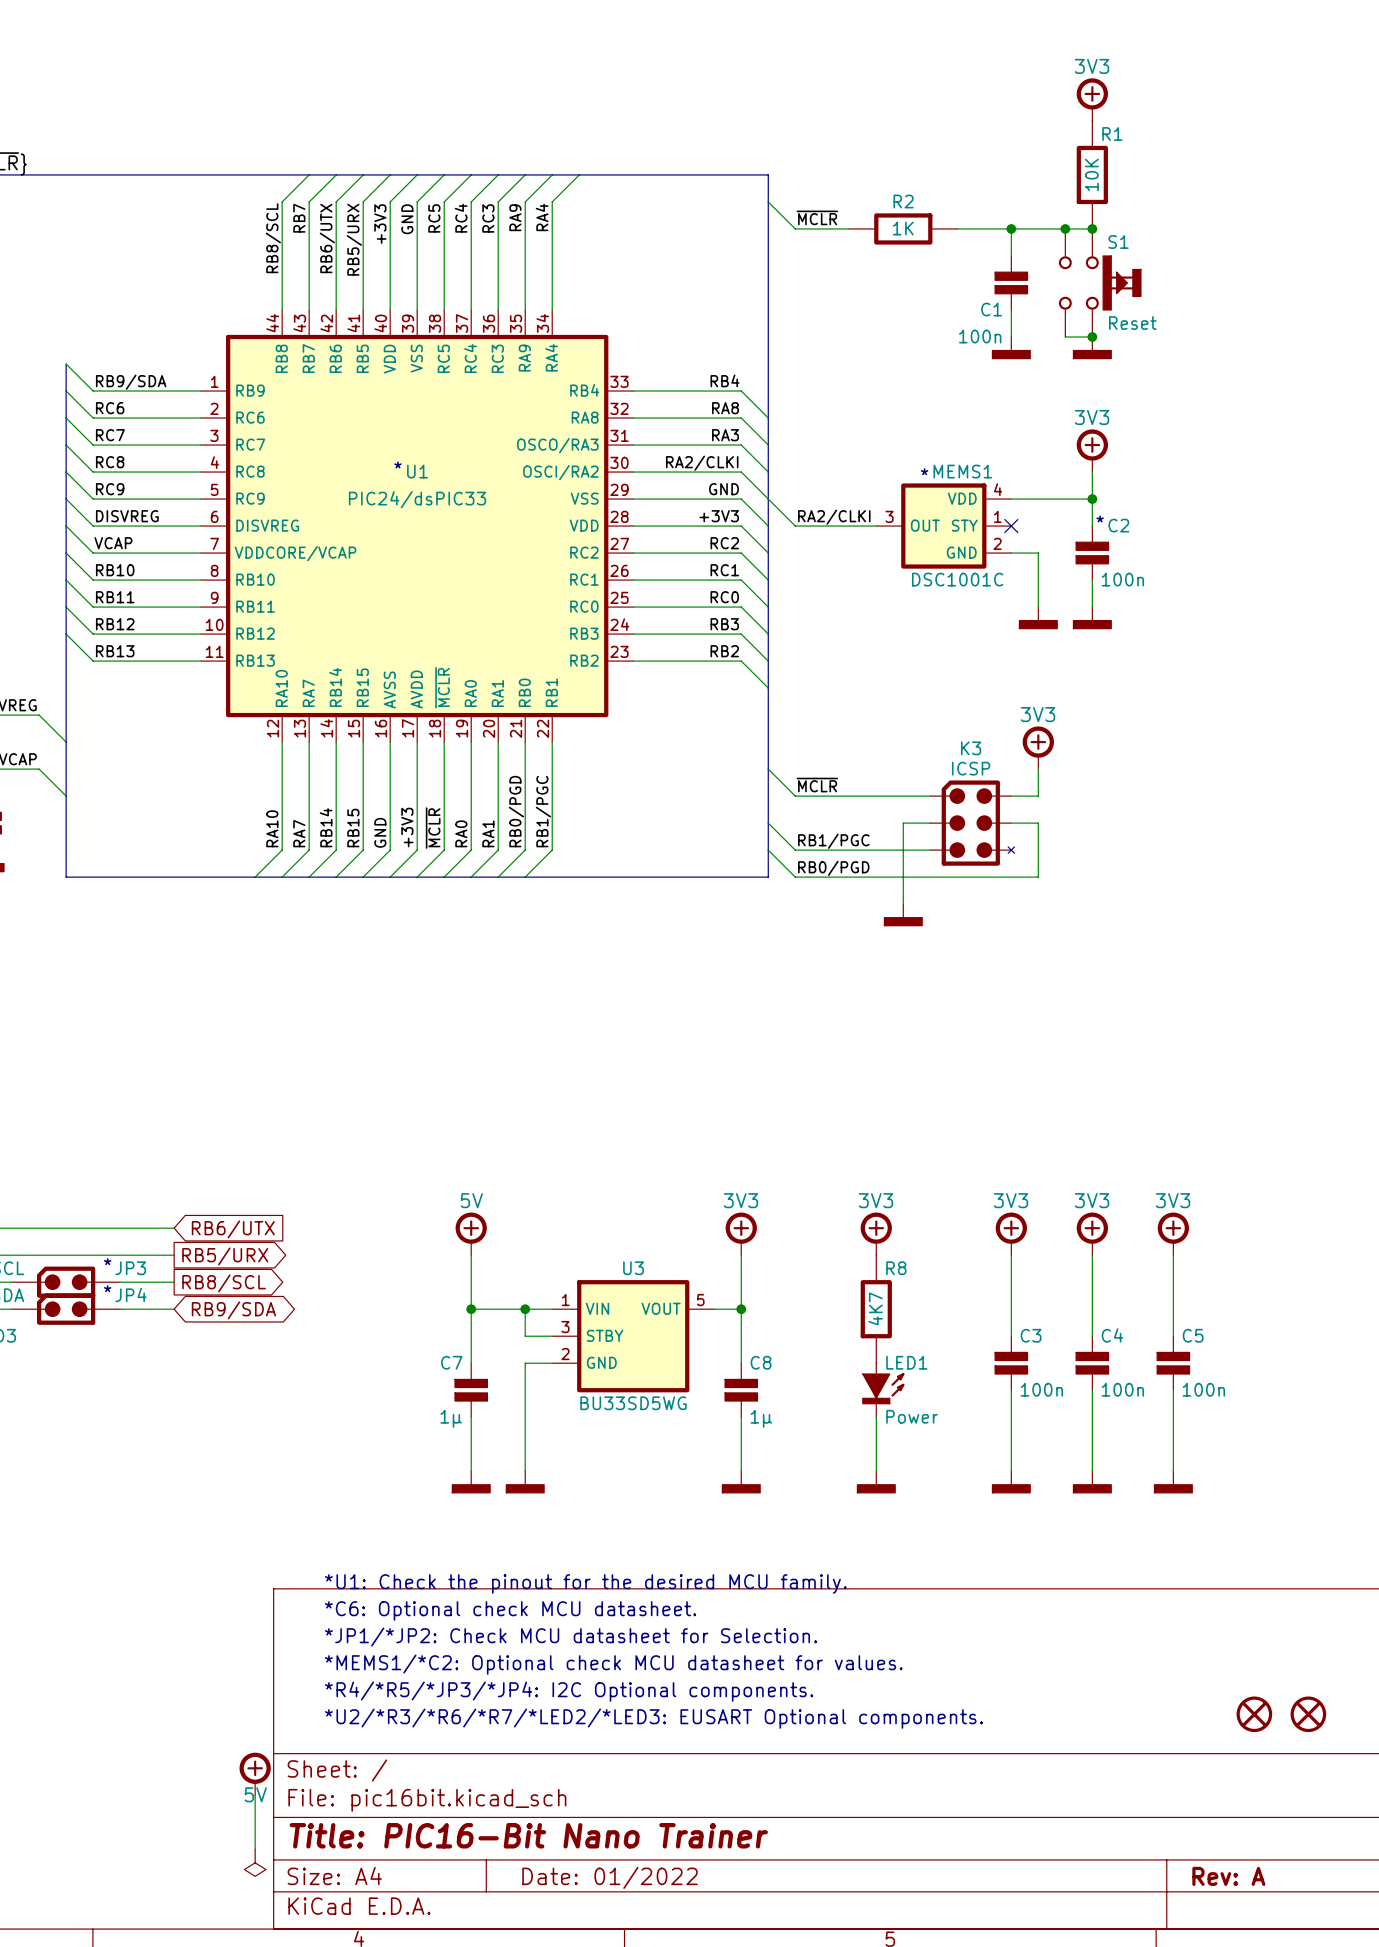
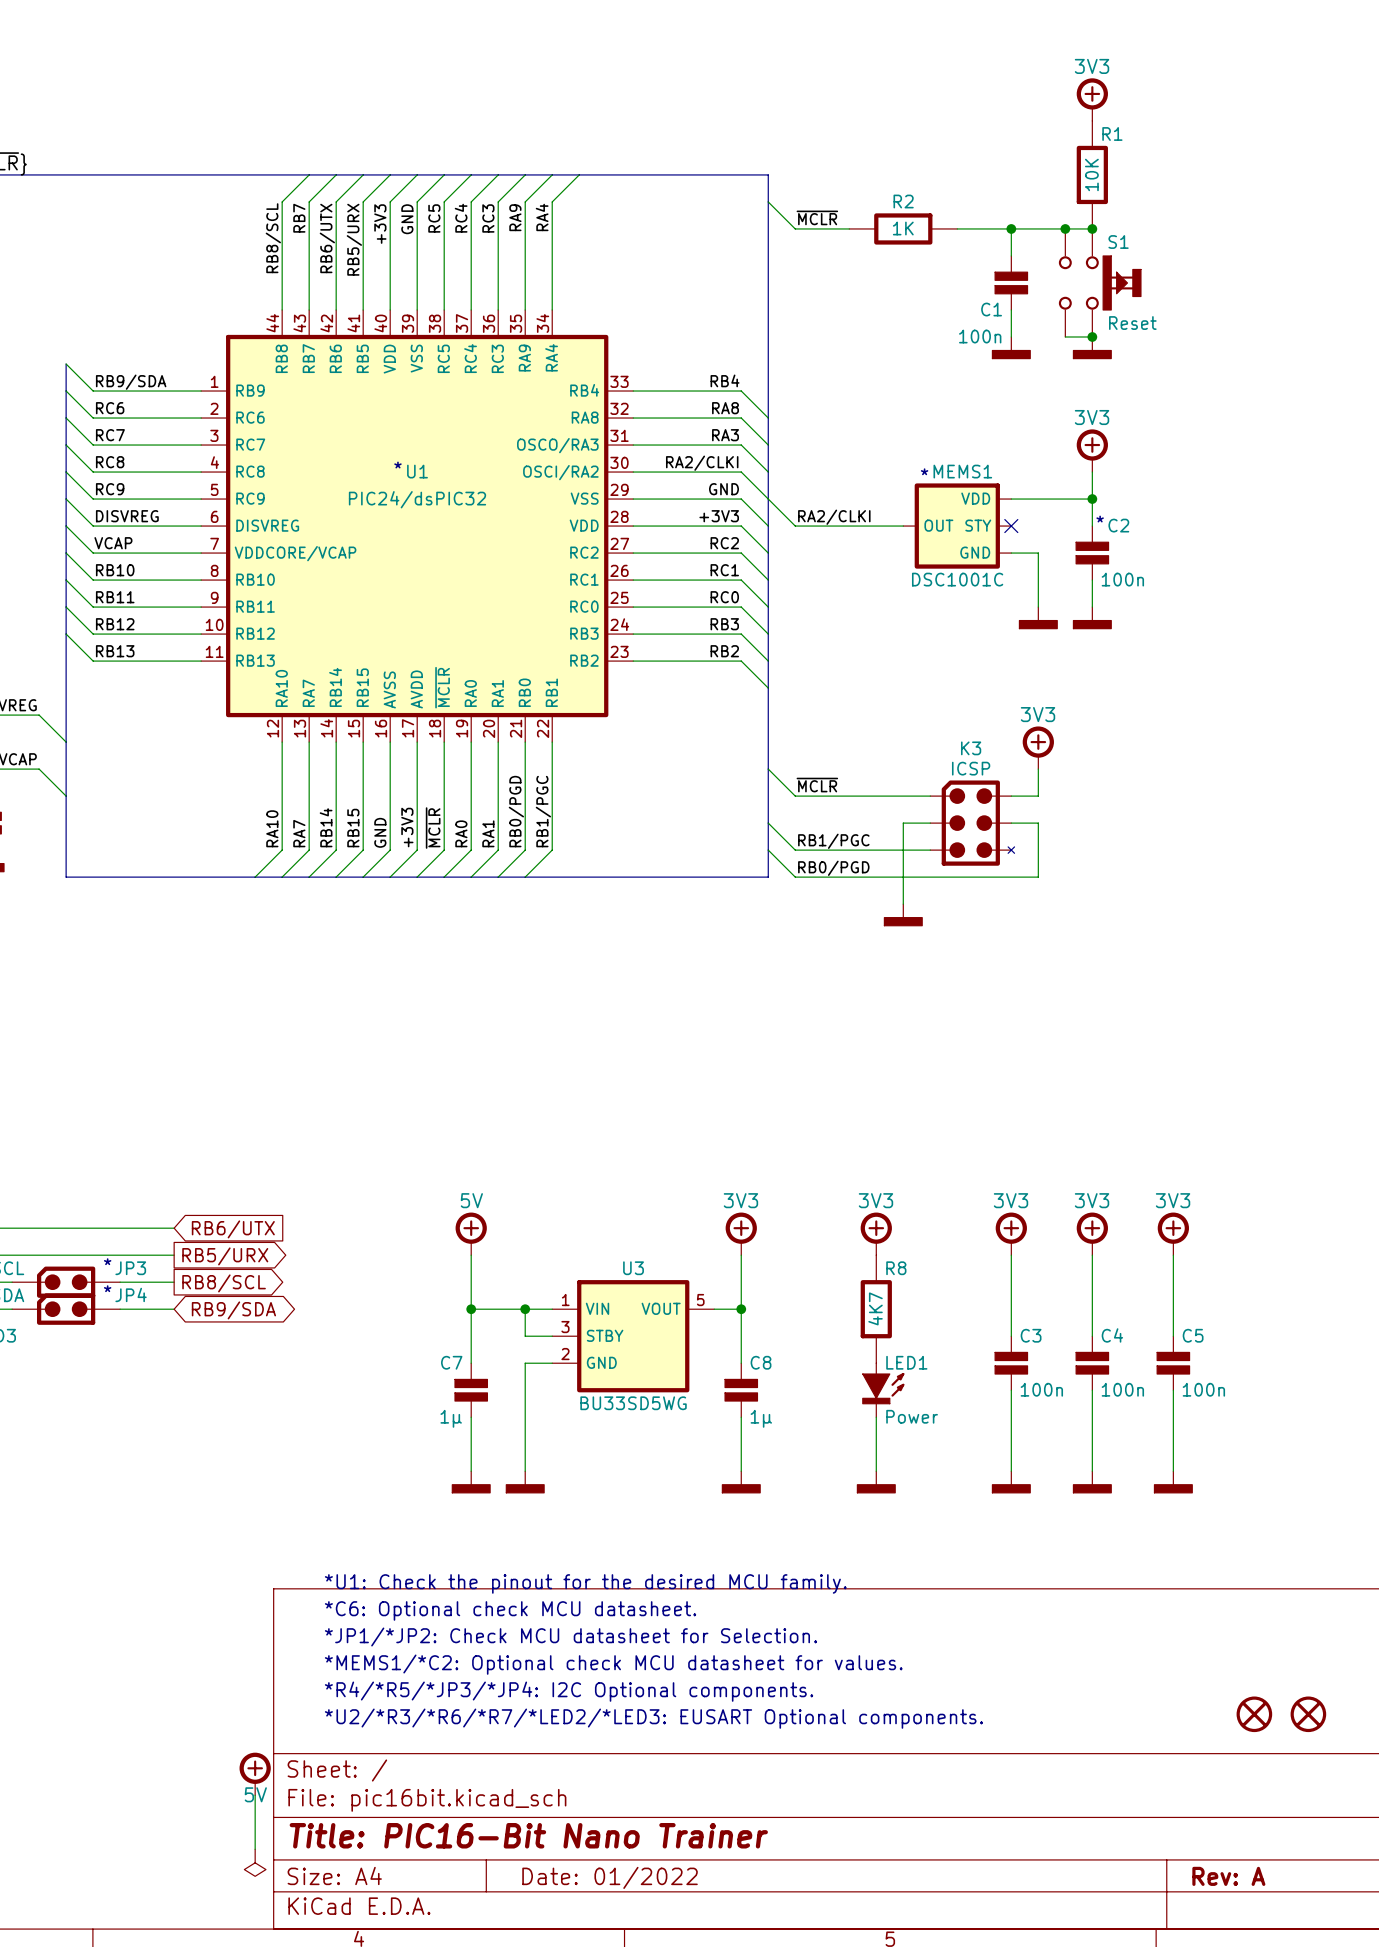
MEMS1 symbol: [876, 483, 1012, 569] -> [903, 483, 1012, 569]
U1 value: PIC24/dsPIC33 (417, 499) -> PIC24/dsPIC32 (417, 499)

